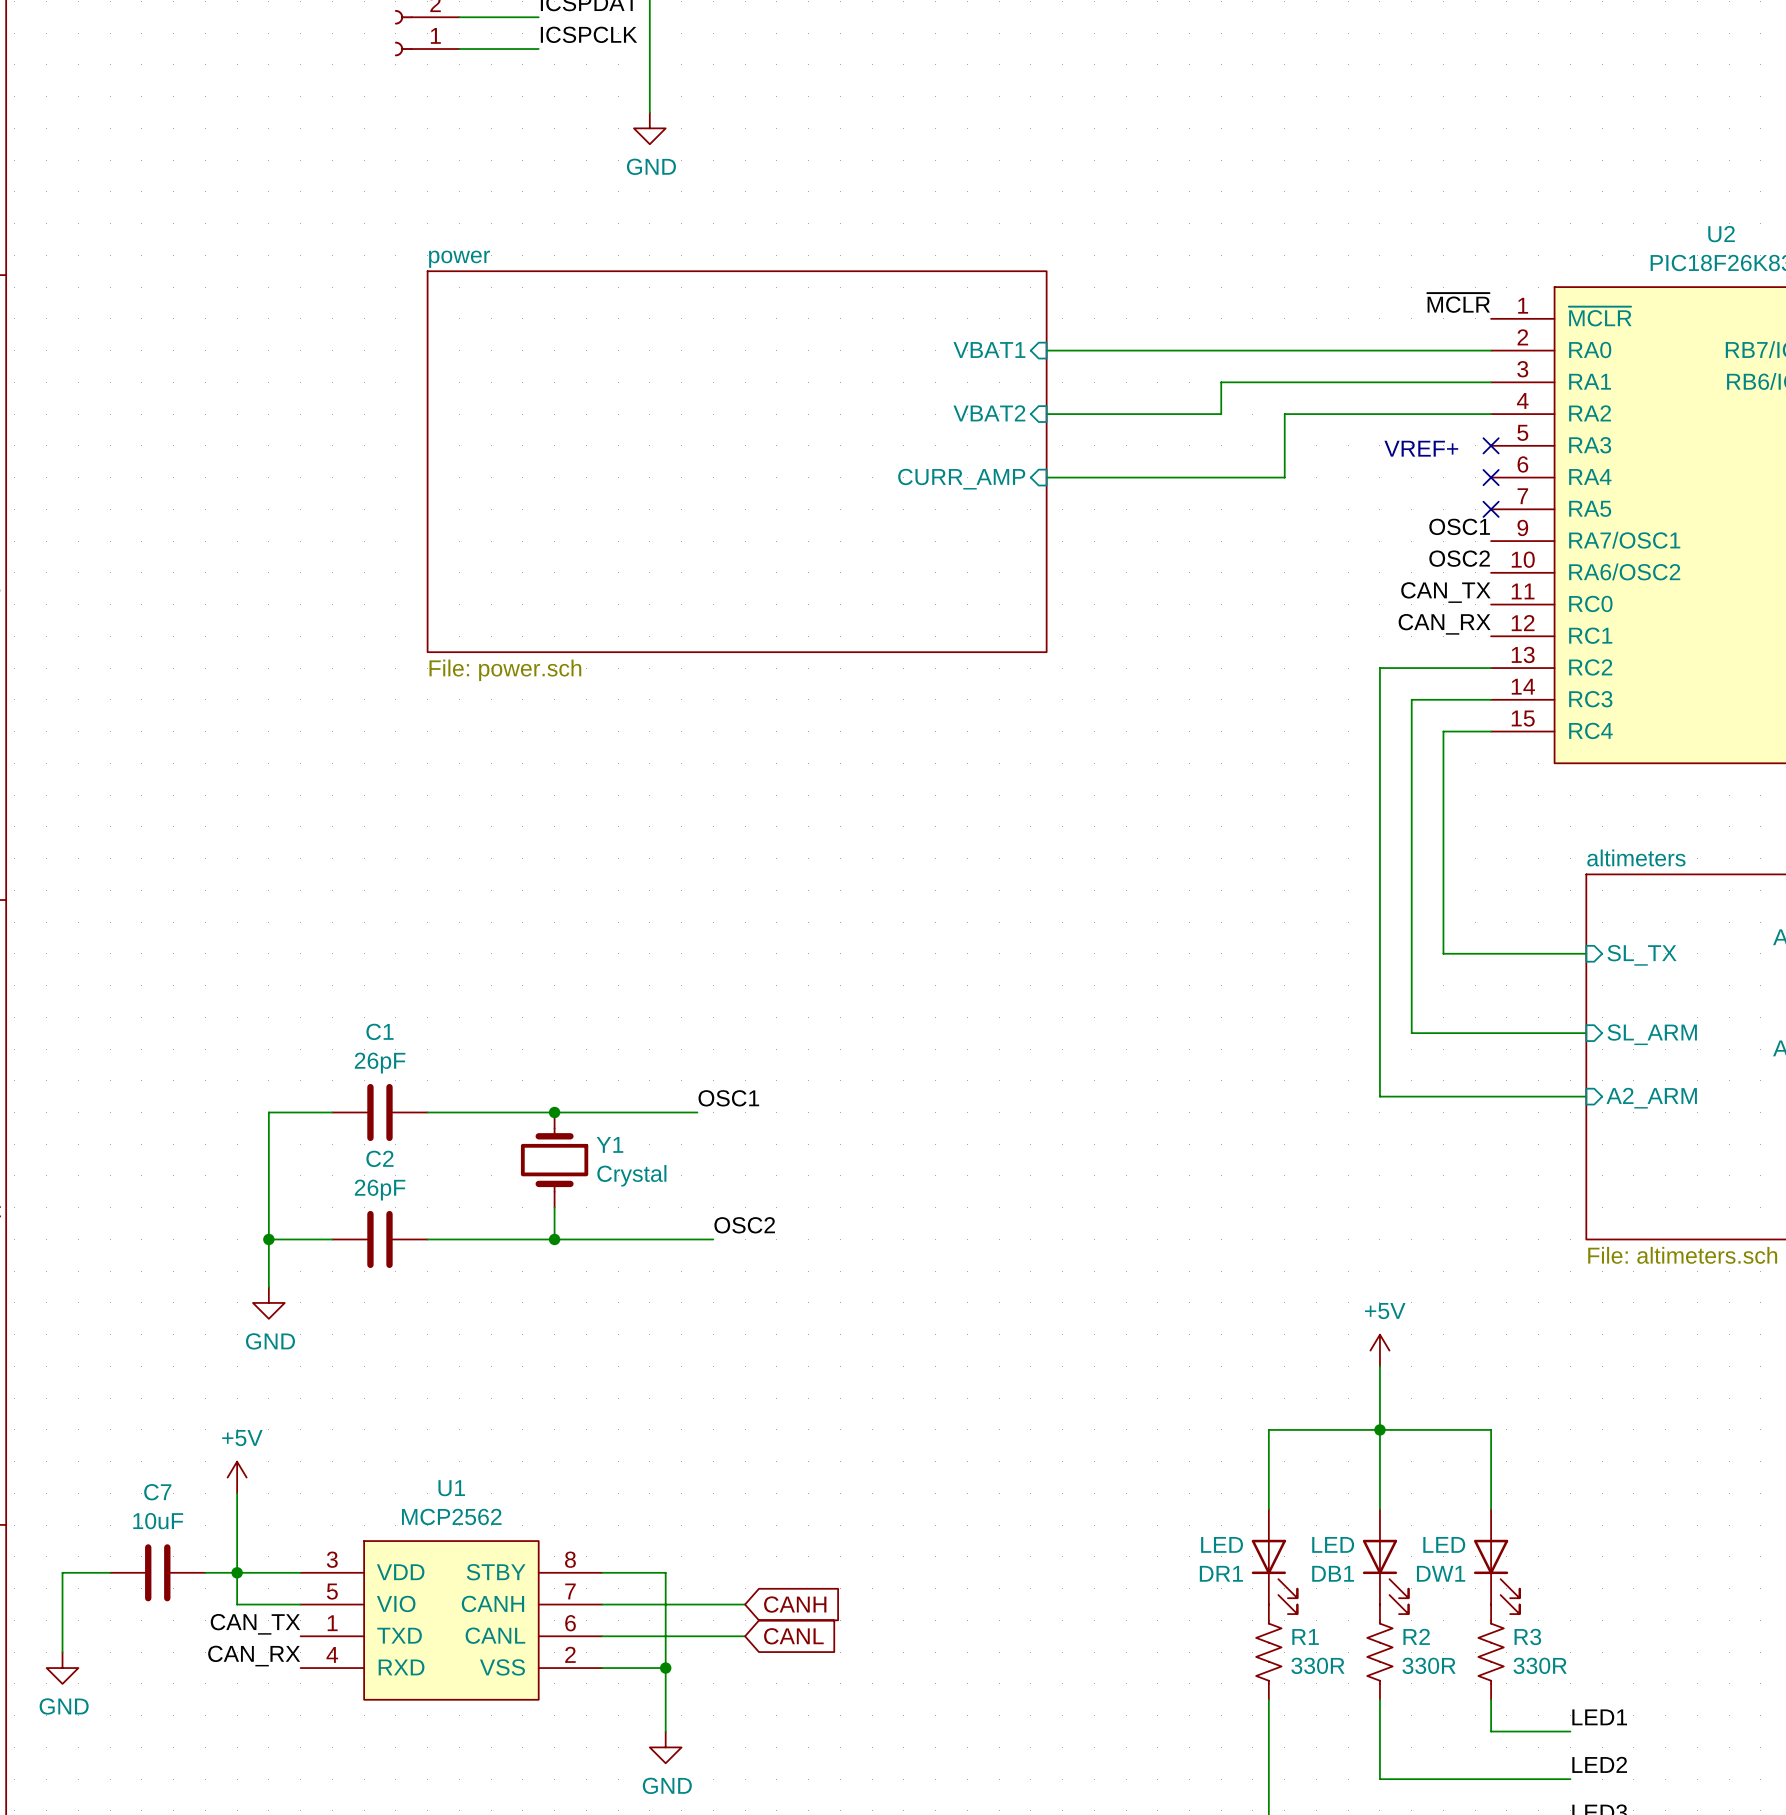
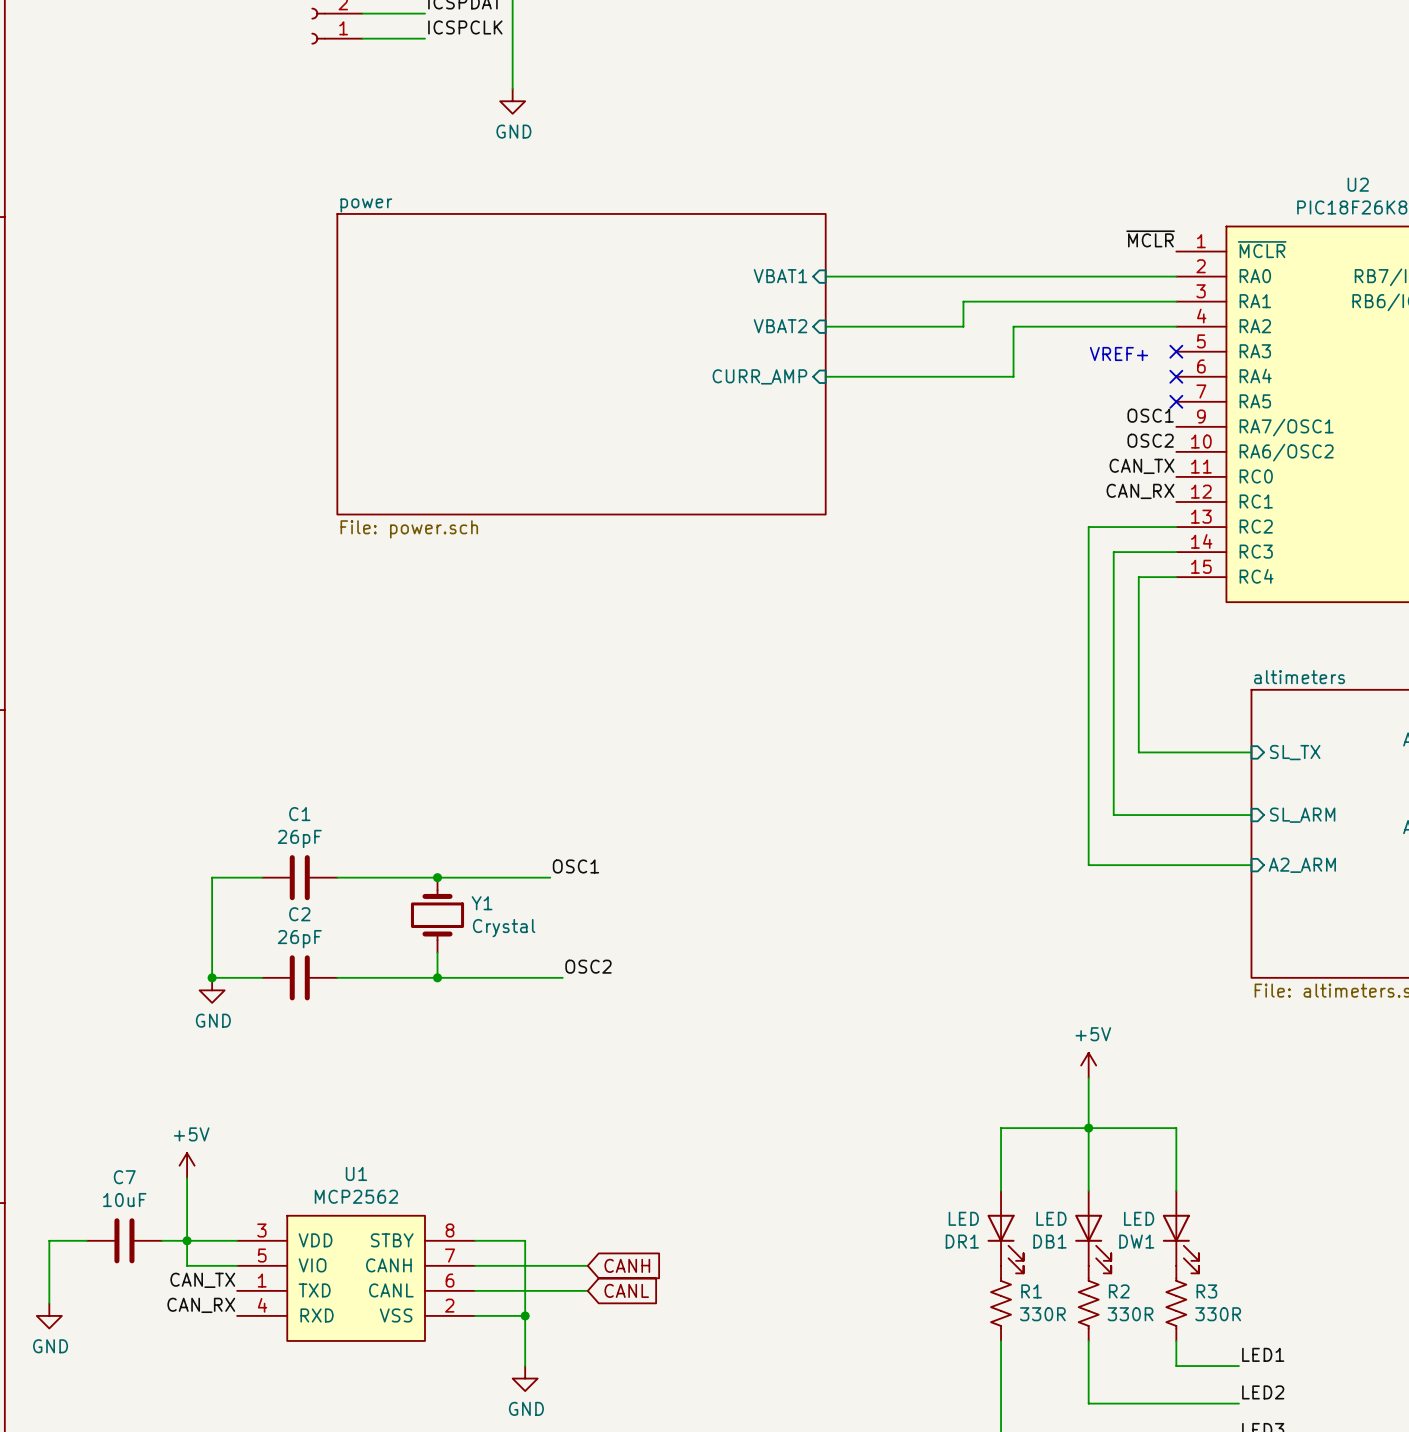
wire: (268, 1239) (268, 1287) -> none
power symbol position: GND (268, 1302) -> GND (212, 990)

